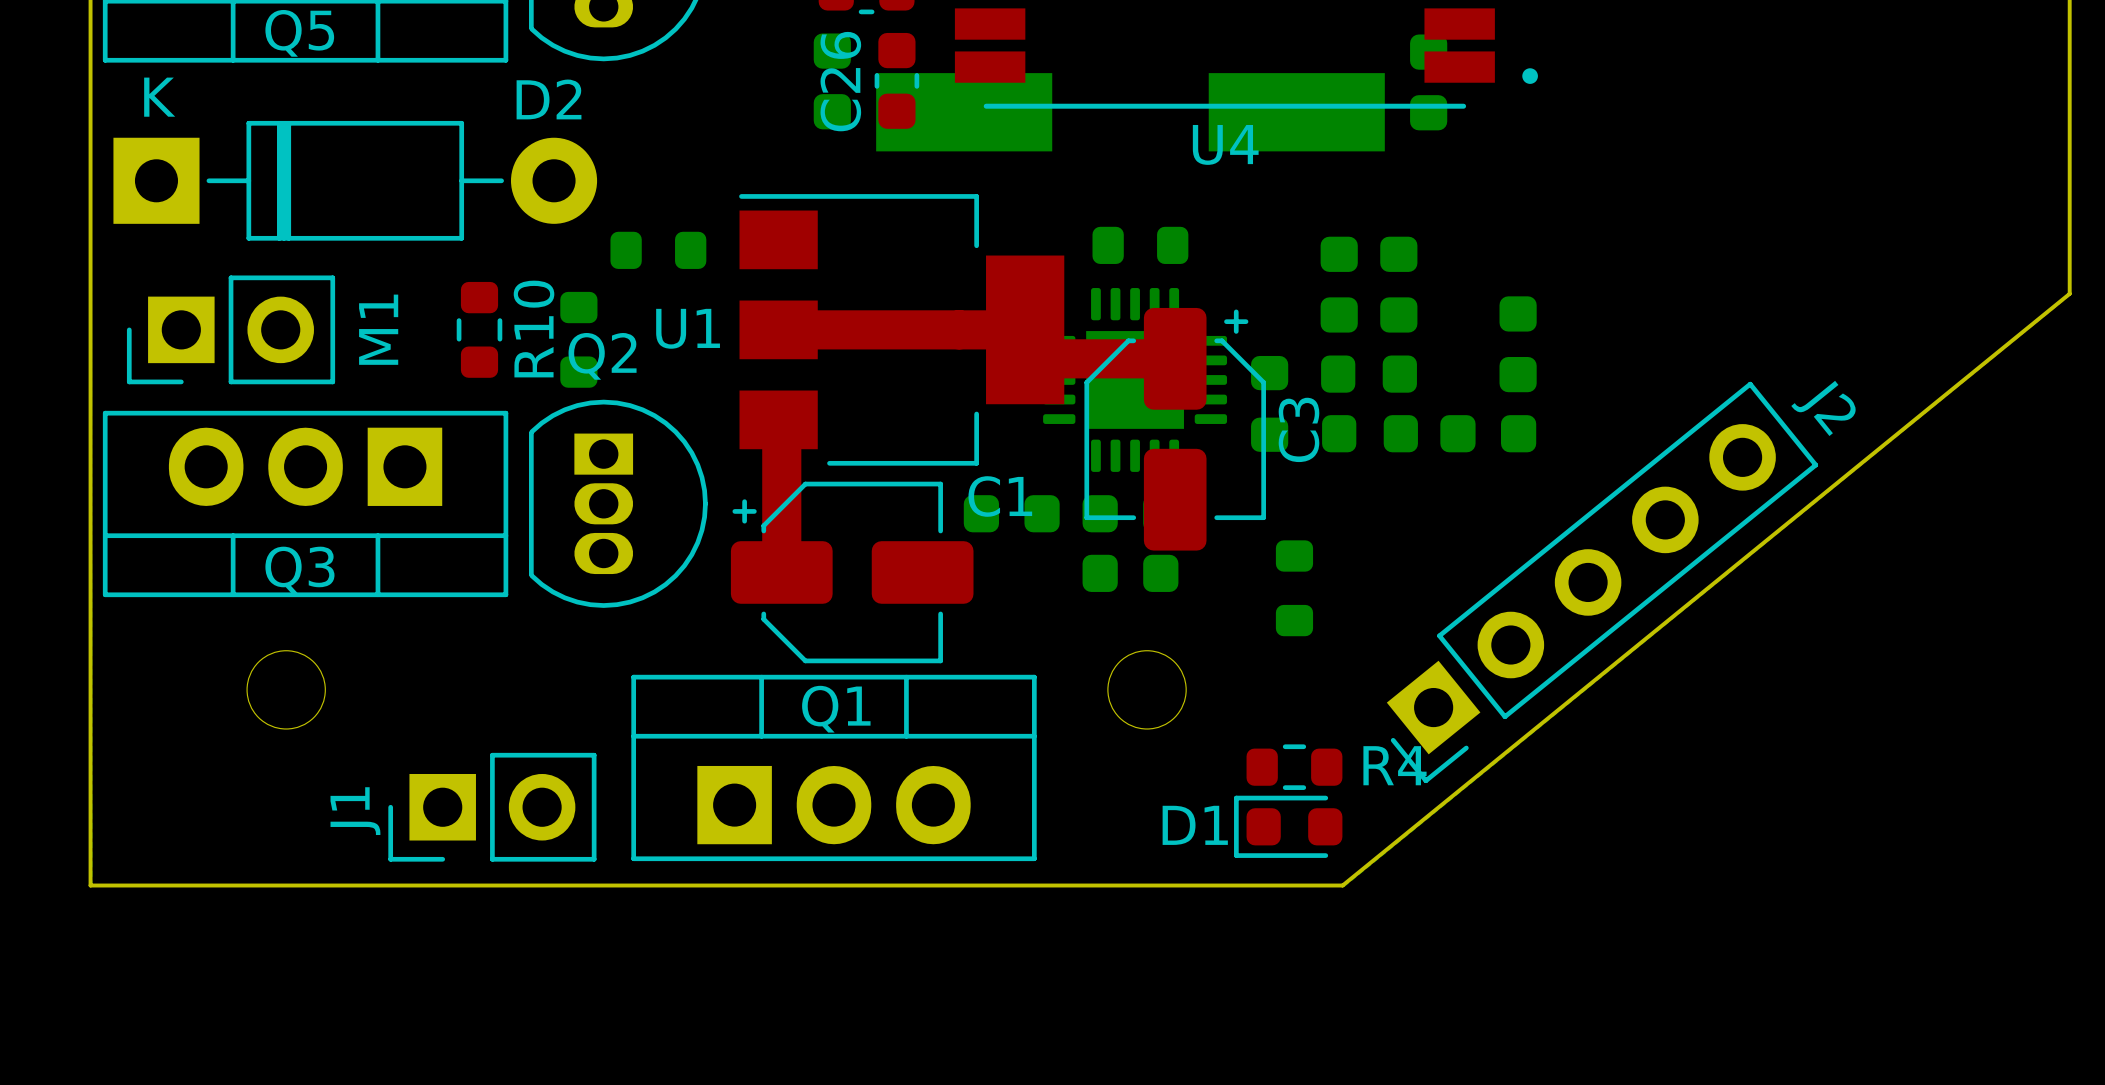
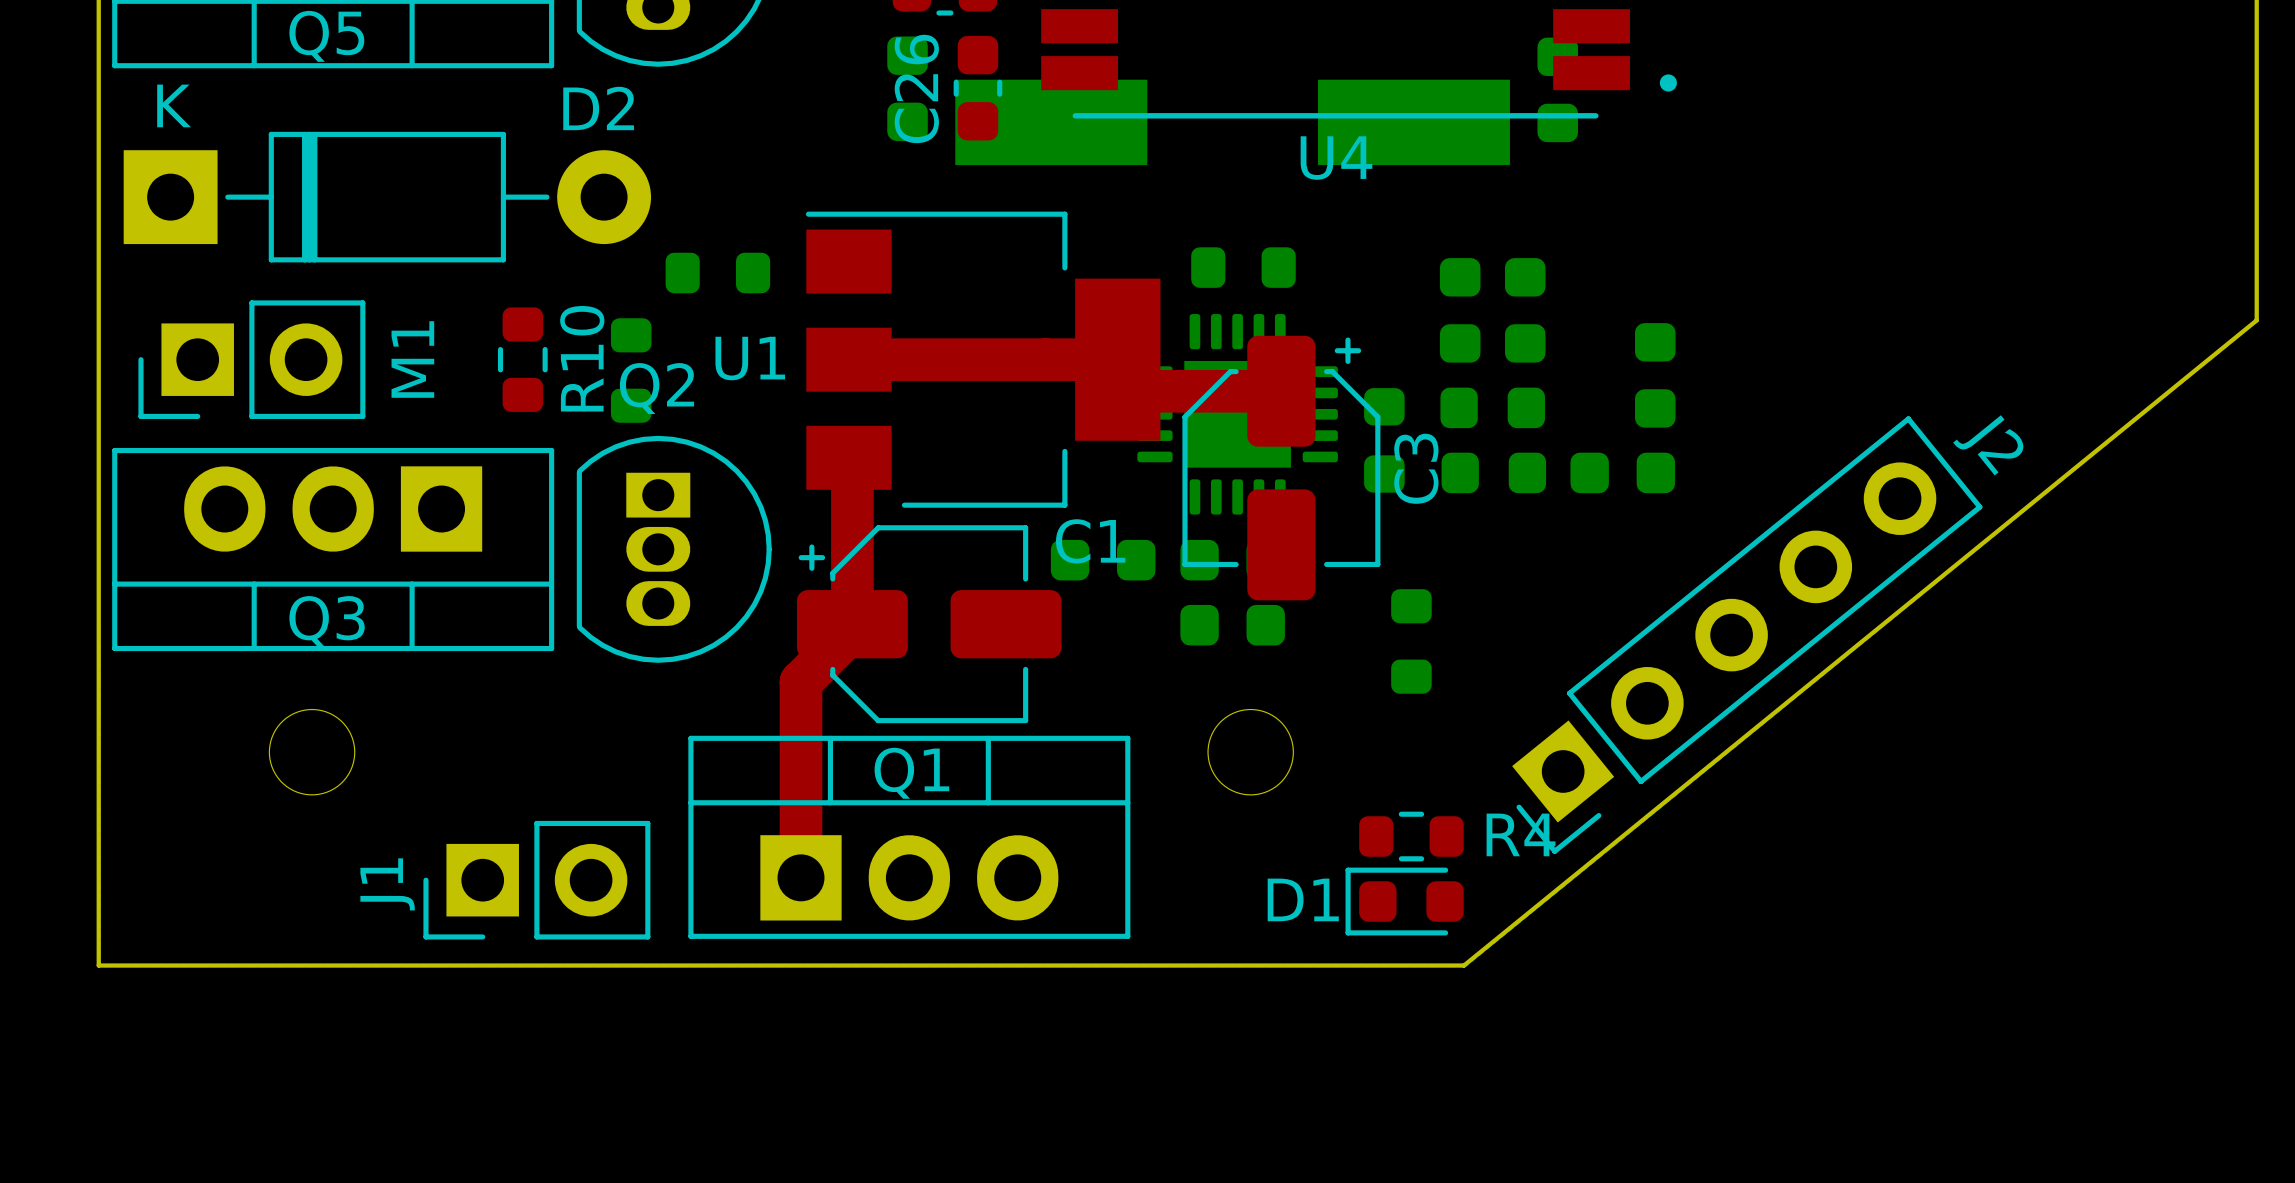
top track: none -> (852, 630) (800, 682) (800, 877)

